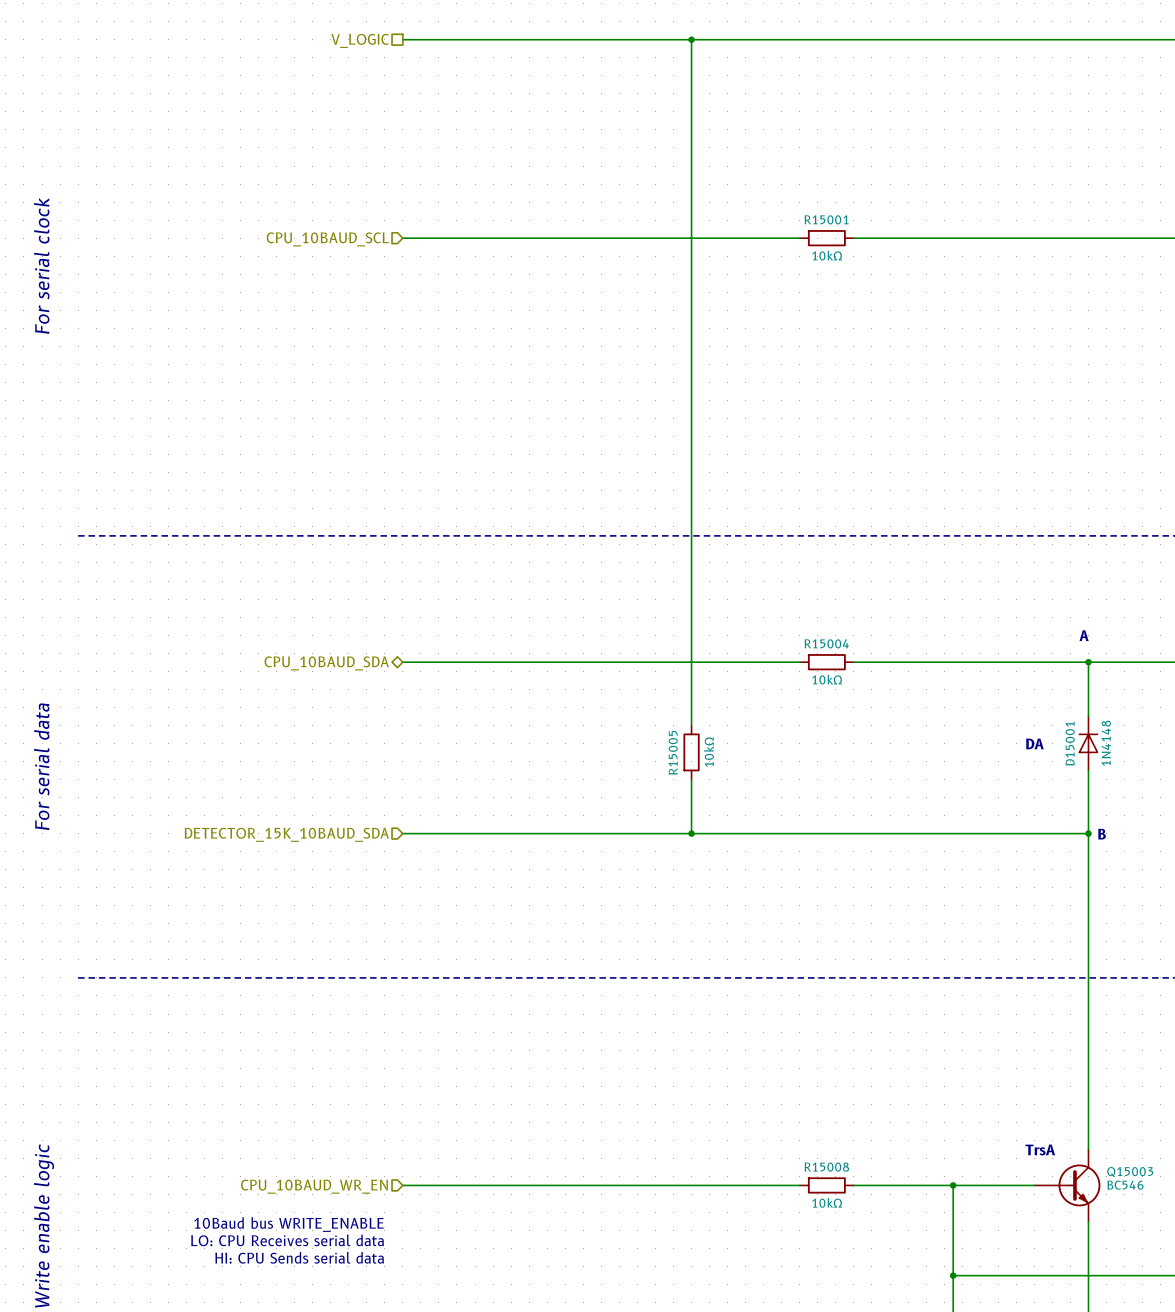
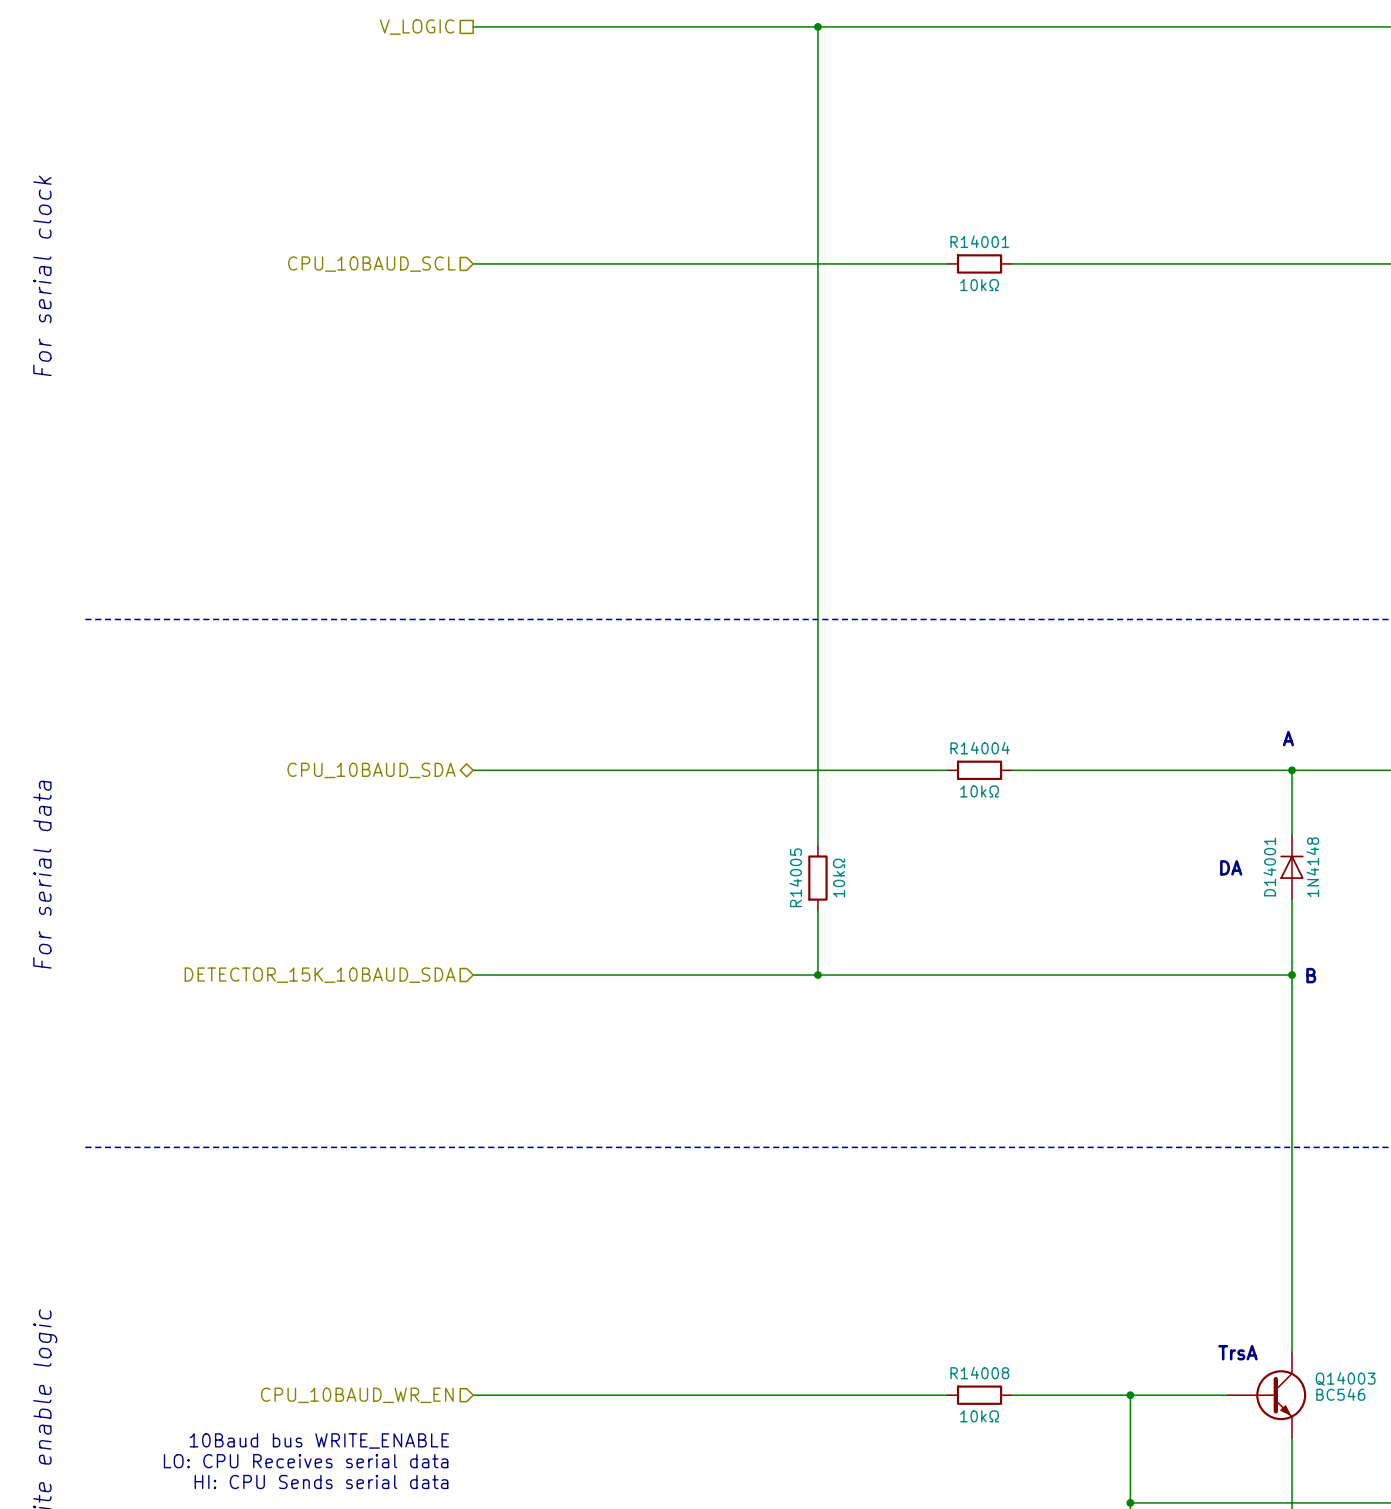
R15001 name: R15001 (826, 219) -> R14001 (979, 241)
R15004 name: R15004 (826, 643) -> R14004 (980, 748)
D15001 name: D15001 (1070, 743) -> D14001 (1269, 867)
R15005 name: R15005 (673, 752) -> R14005 (795, 877)
R15008 name: R15008 (826, 1167) -> R14008 (979, 1372)
Q15003 name: Q15003 (1130, 1172) -> Q14003 (1345, 1378)

